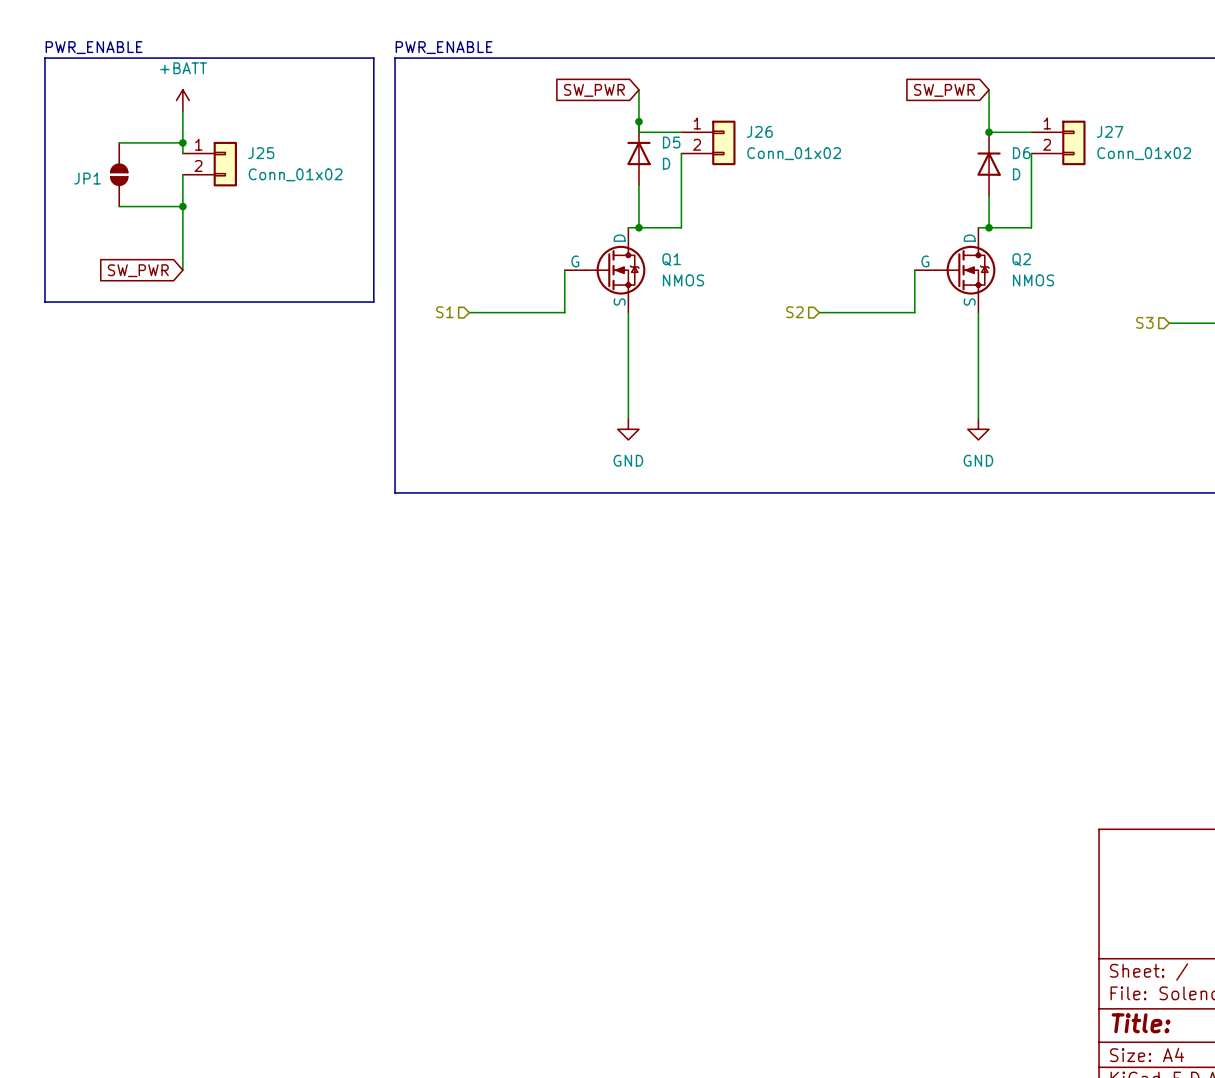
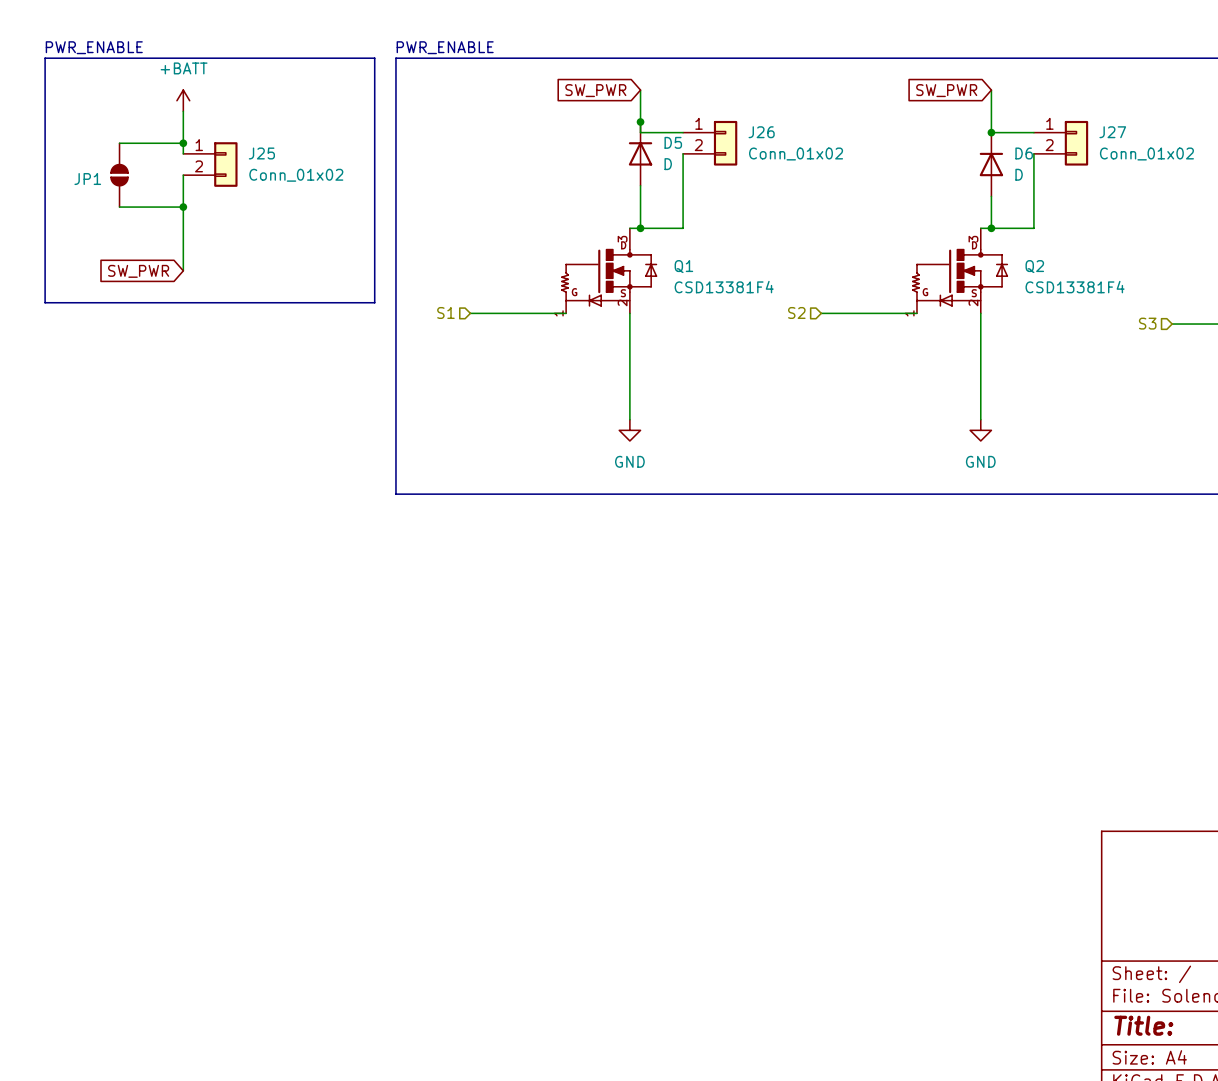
Q1 symbol: [564, 227, 646, 313] -> [561, 228, 658, 315]
Q2 symbol: [914, 227, 996, 313] -> [912, 228, 1009, 315]
Q1 value: NMOS (683, 280) -> CSD13381F4 (724, 287)
Q2 value: NMOS (1033, 280) -> CSD13381F4 (1075, 287)

